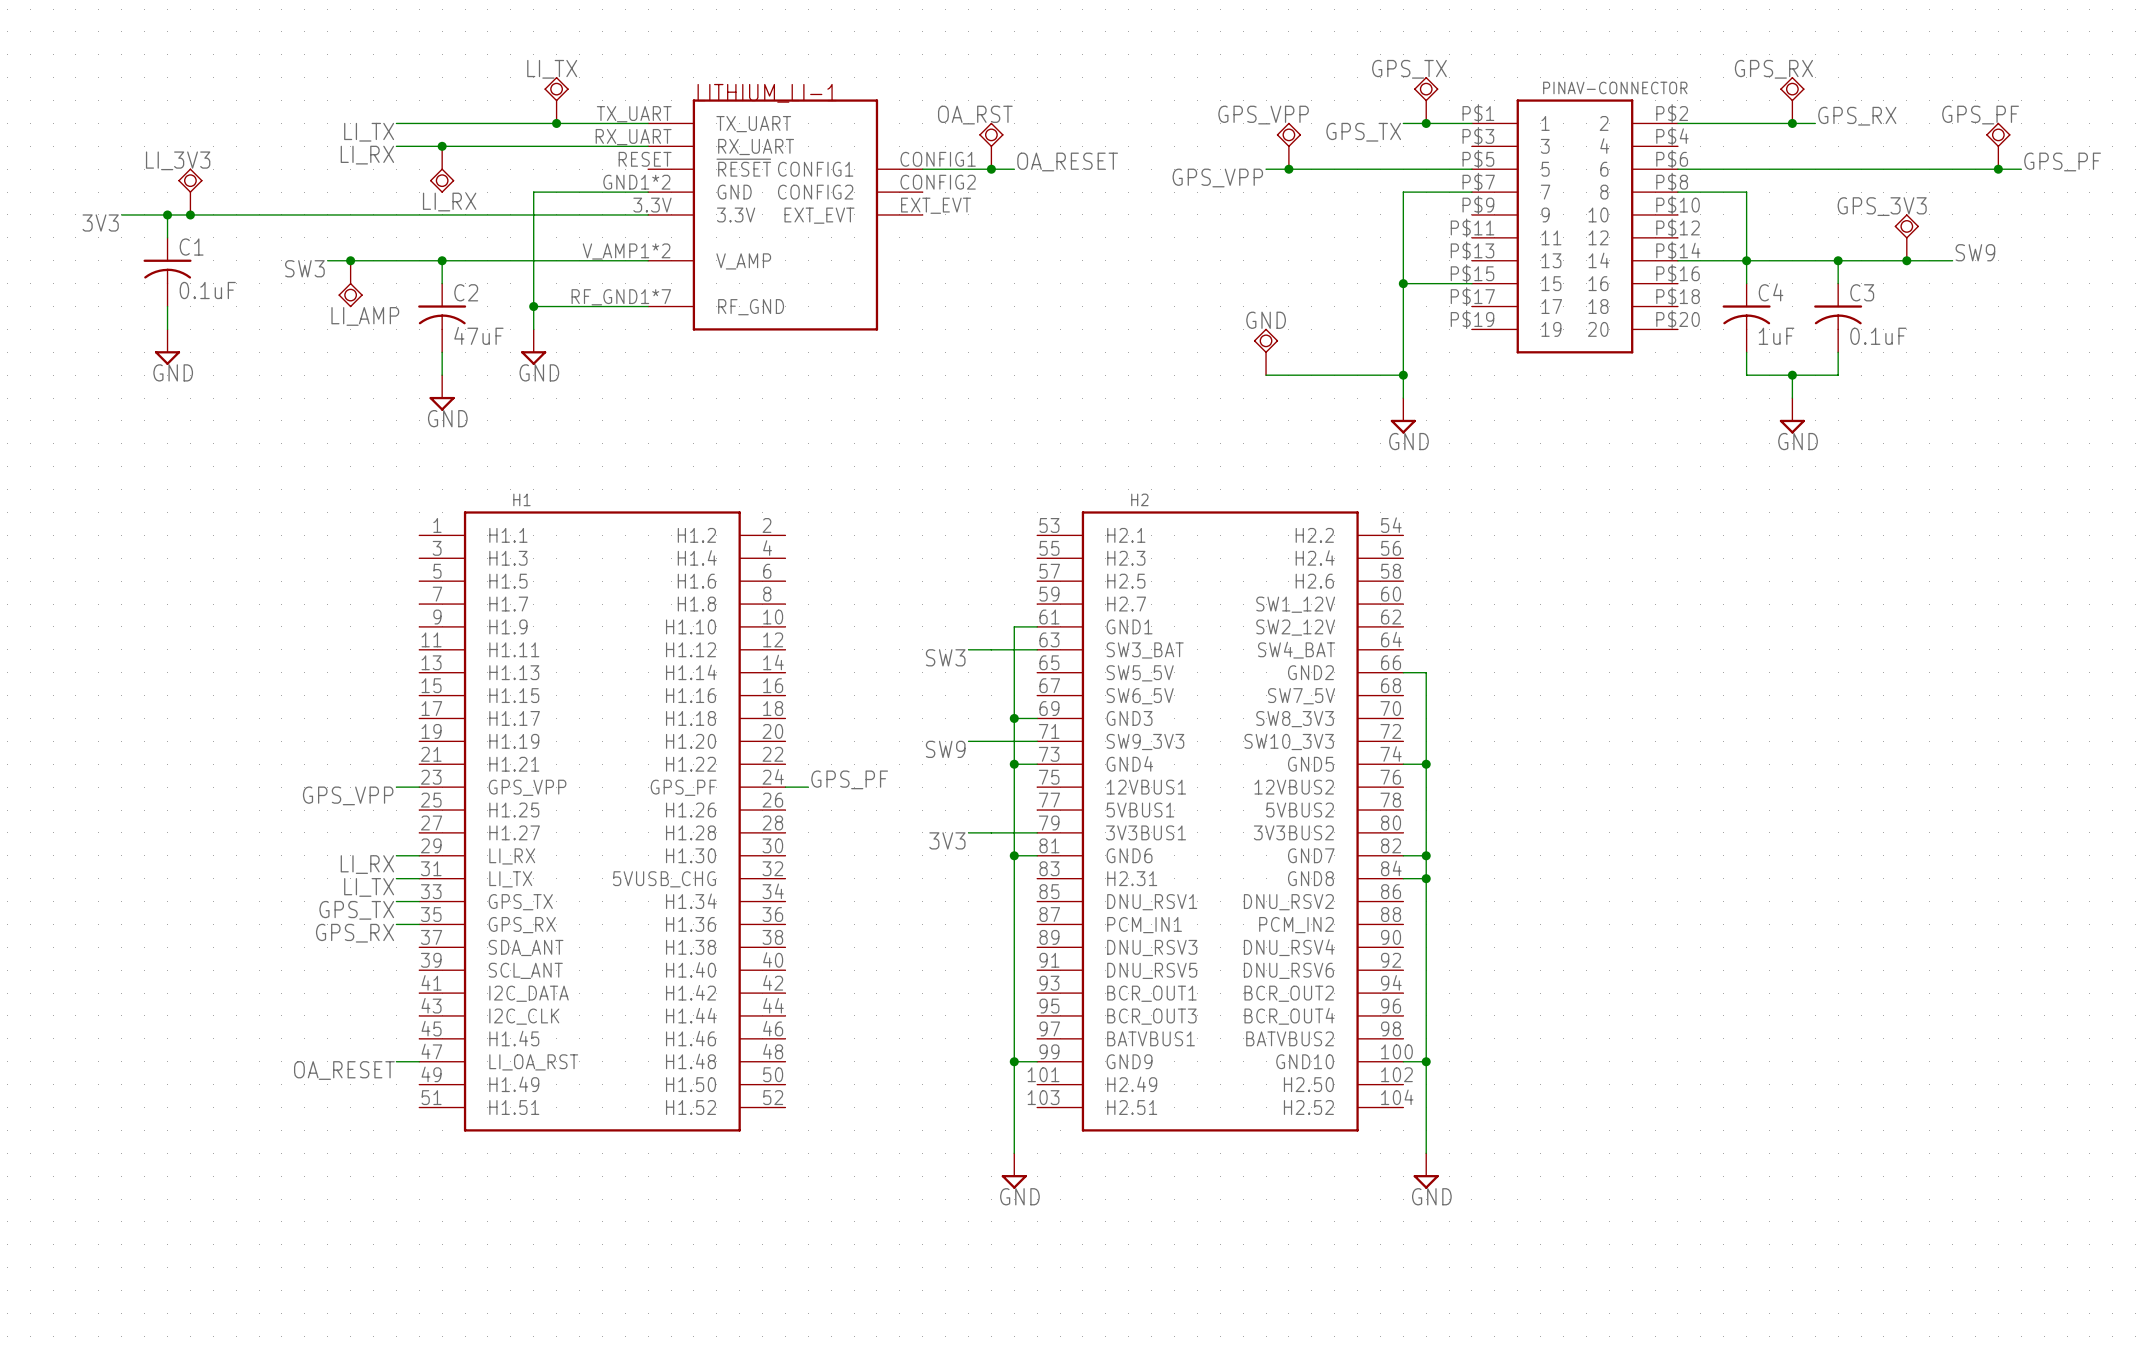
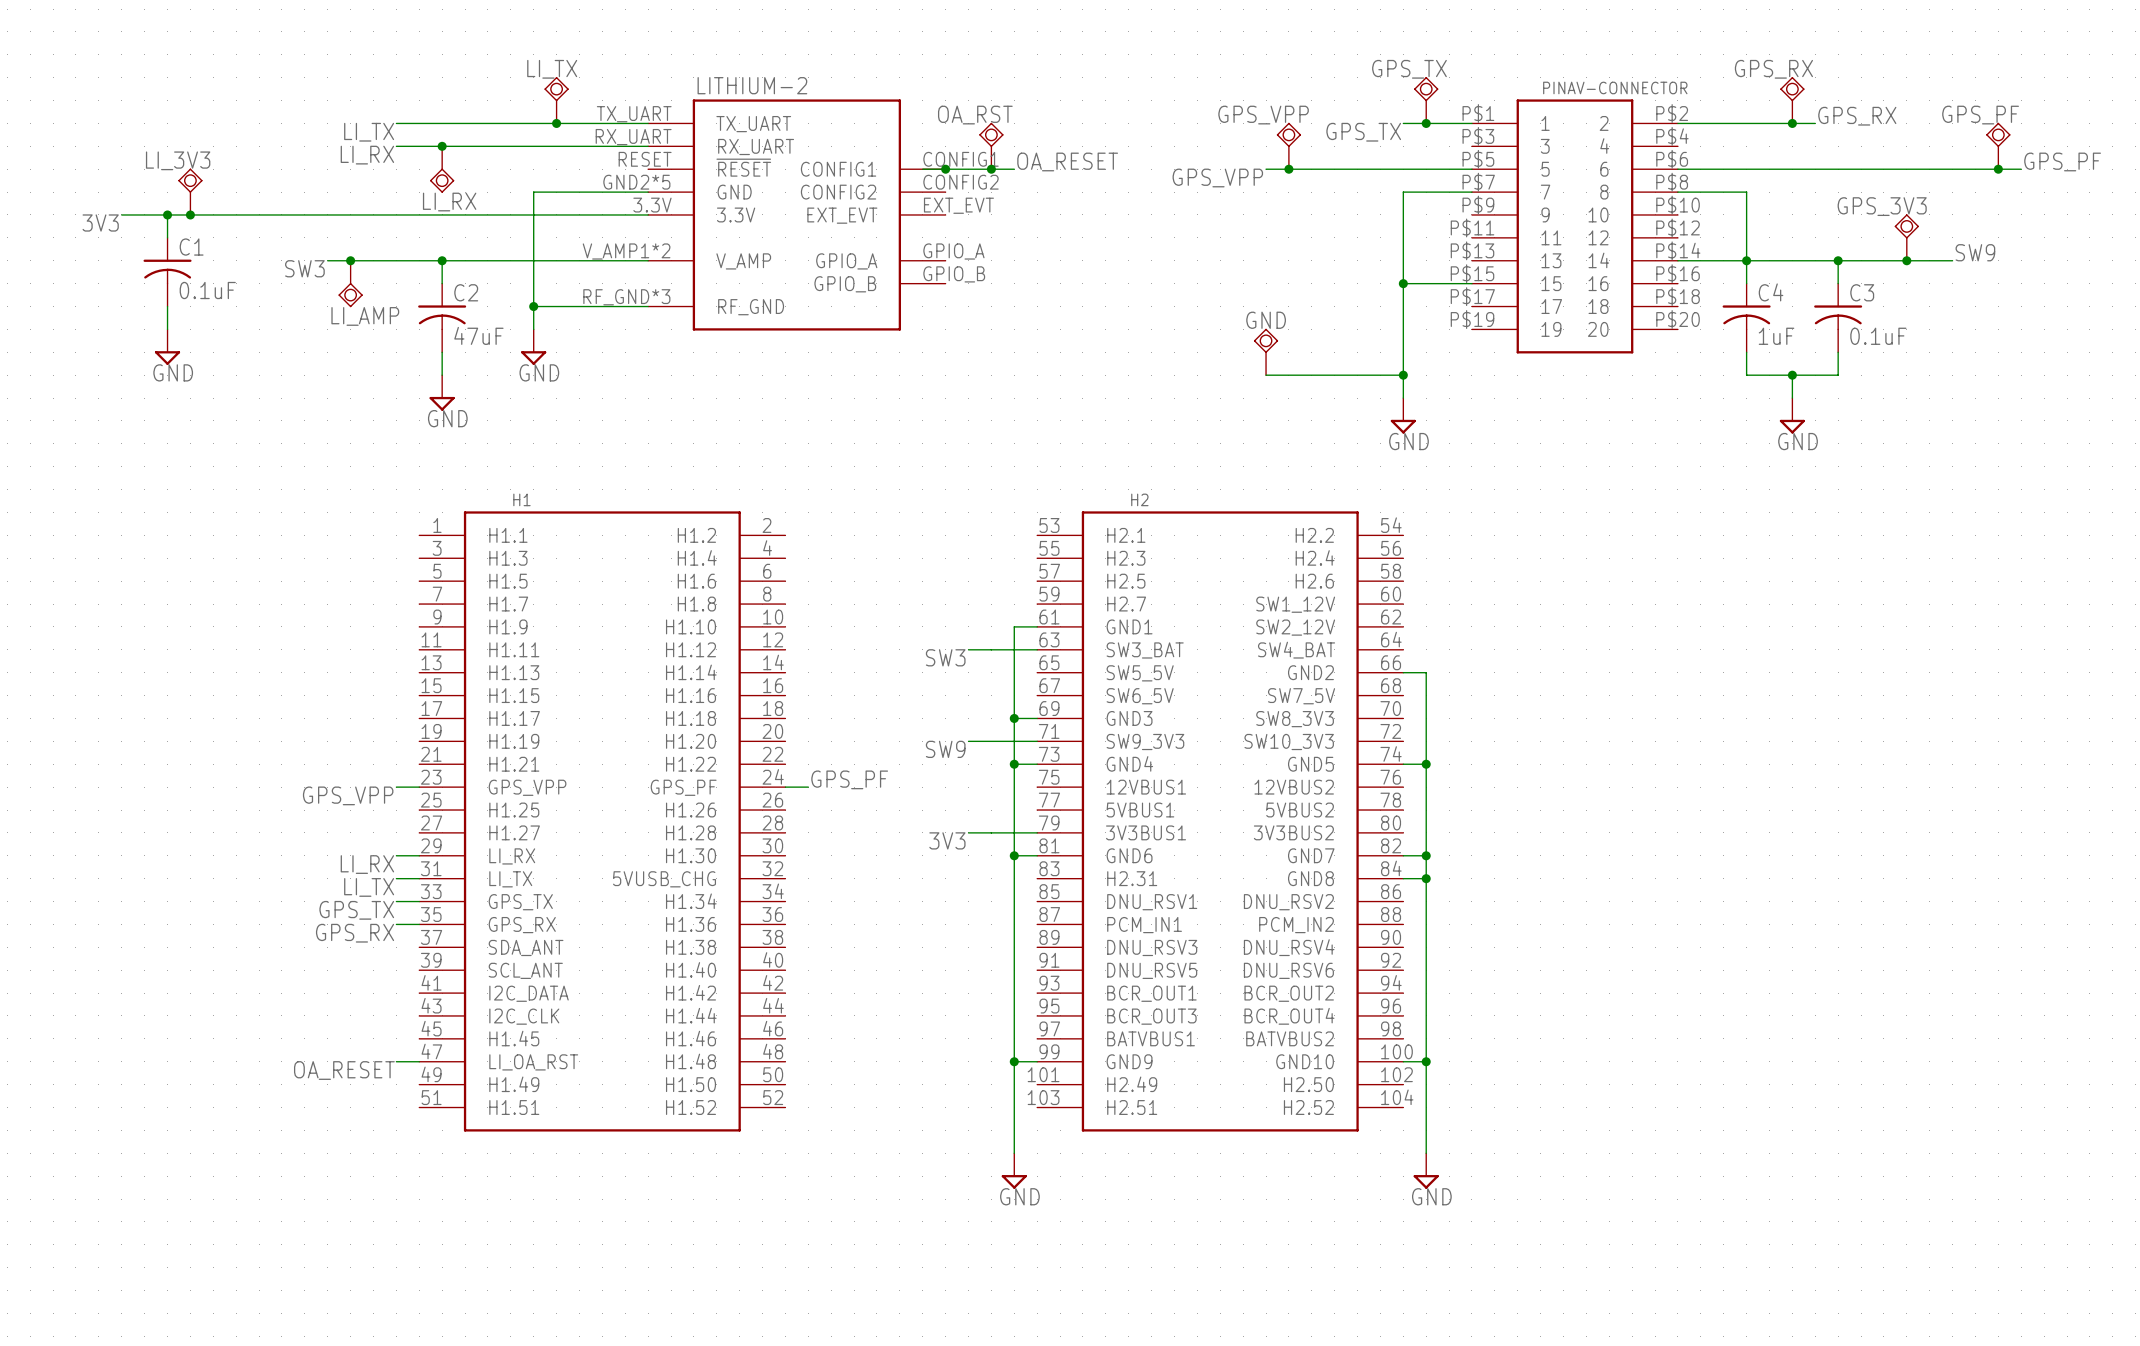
junction: none -> (945, 169)
part: (785, 214) -> none
LITHIUM-2: none -> (796, 214)

